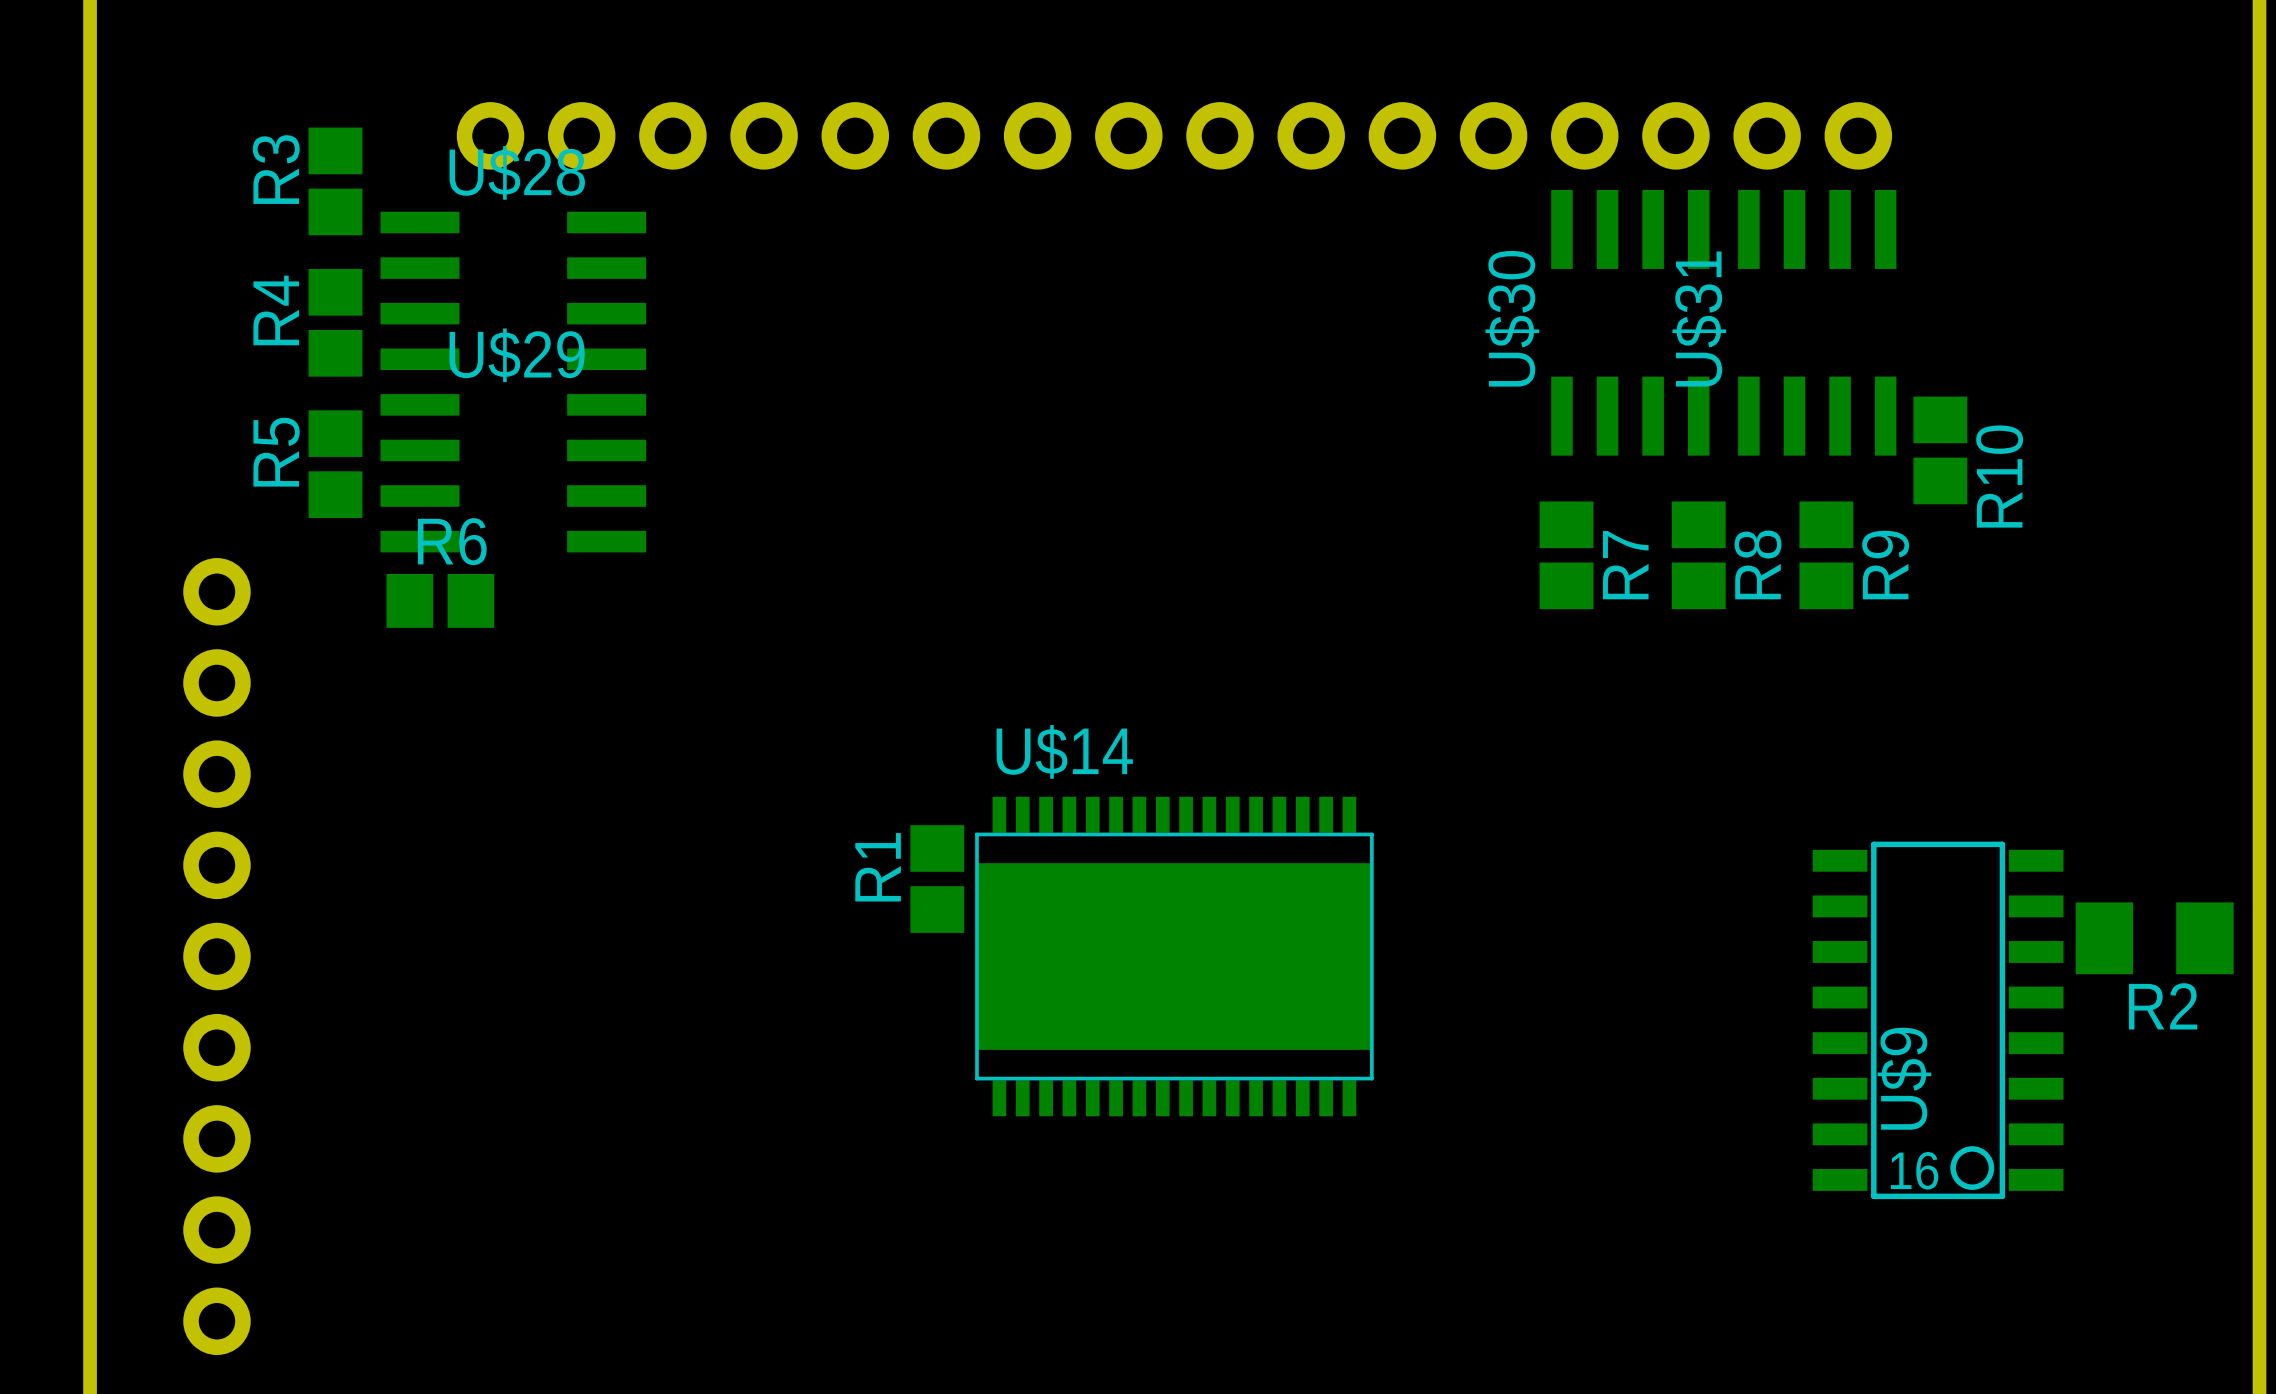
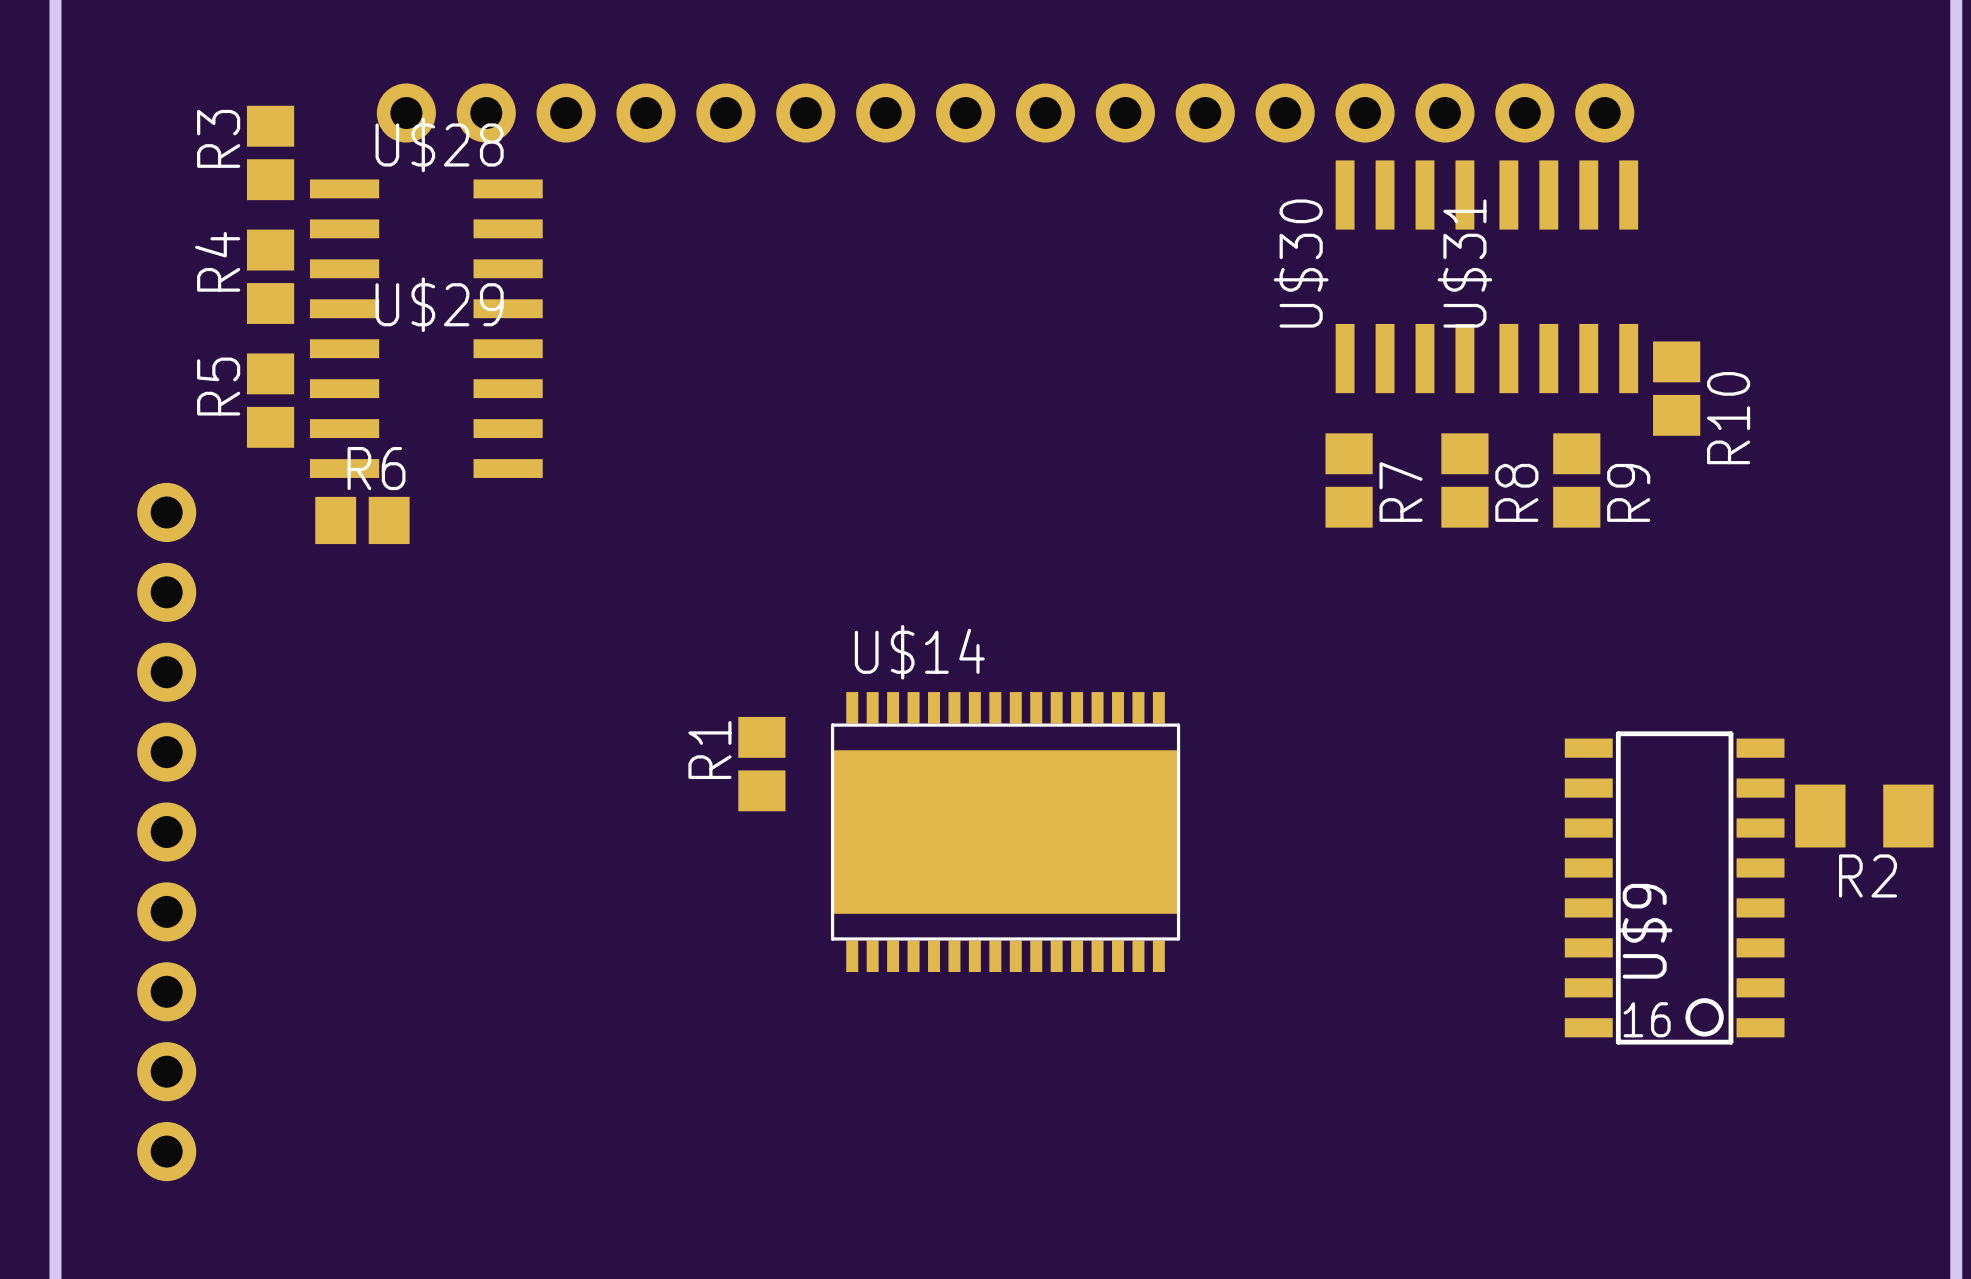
R1 position: (937, 879) -> (761, 764)

